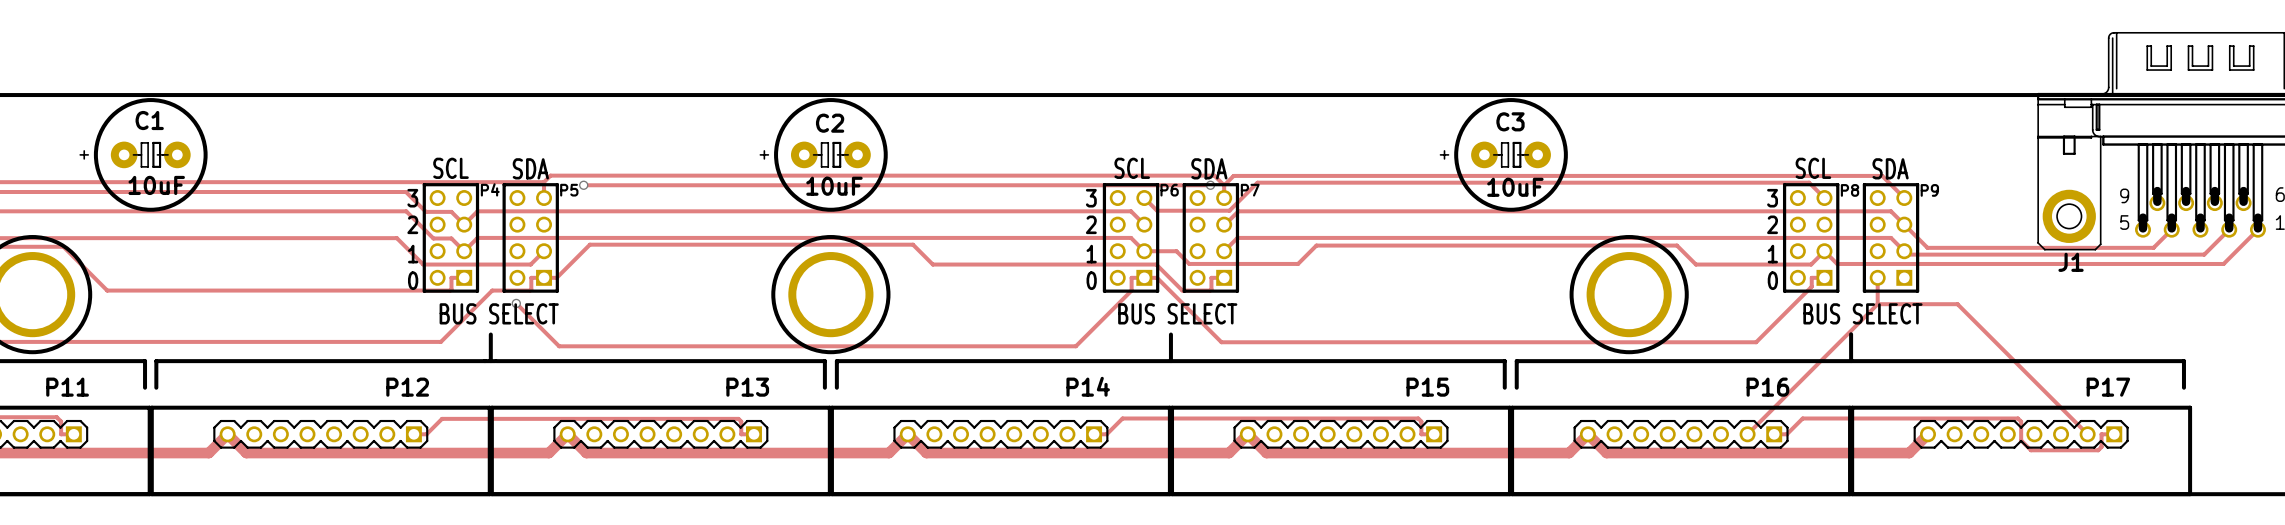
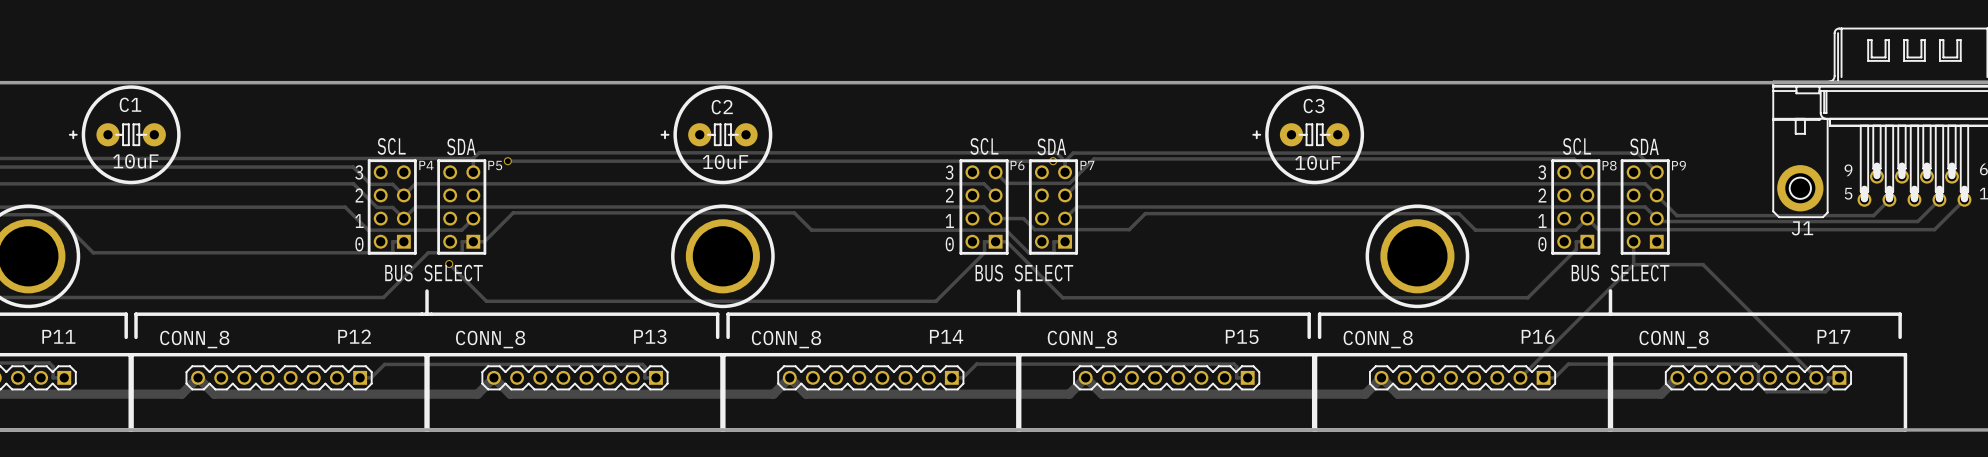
P12 value: none -> CONN_8 (194, 339)
P13 value: none -> CONN_8 (490, 339)
P14 value: none -> CONN_8 (786, 339)
P15 value: none -> CONN_8 (1082, 339)
P16 value: none -> CONN_8 (1378, 339)
P17 value: none -> CONN_8 (1674, 339)

